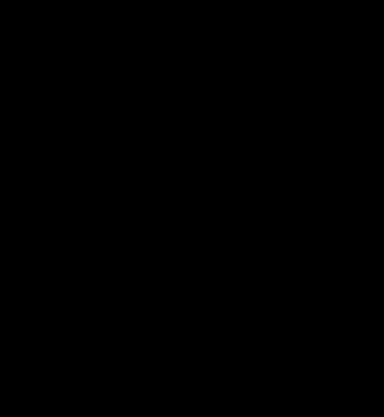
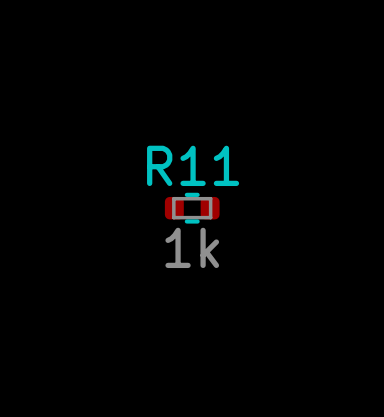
R11: none -> 1k (192, 208)

